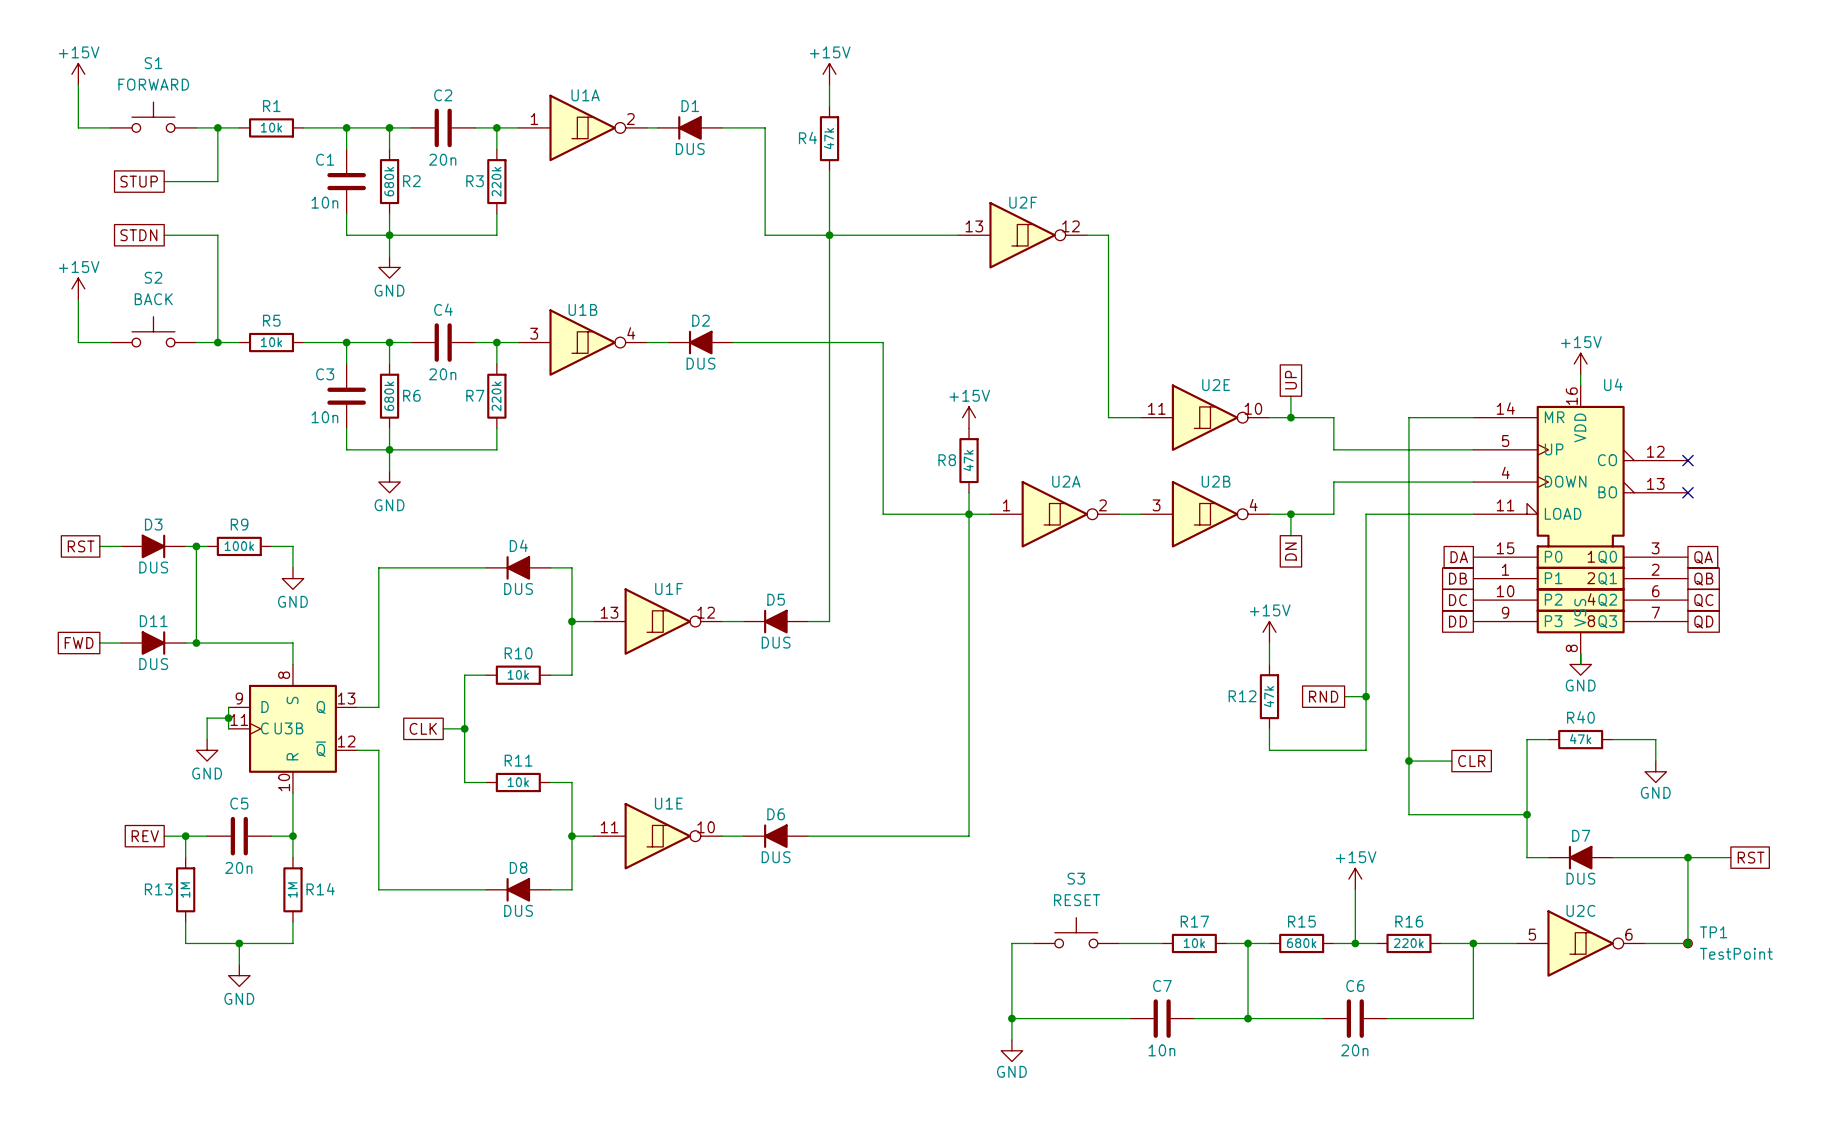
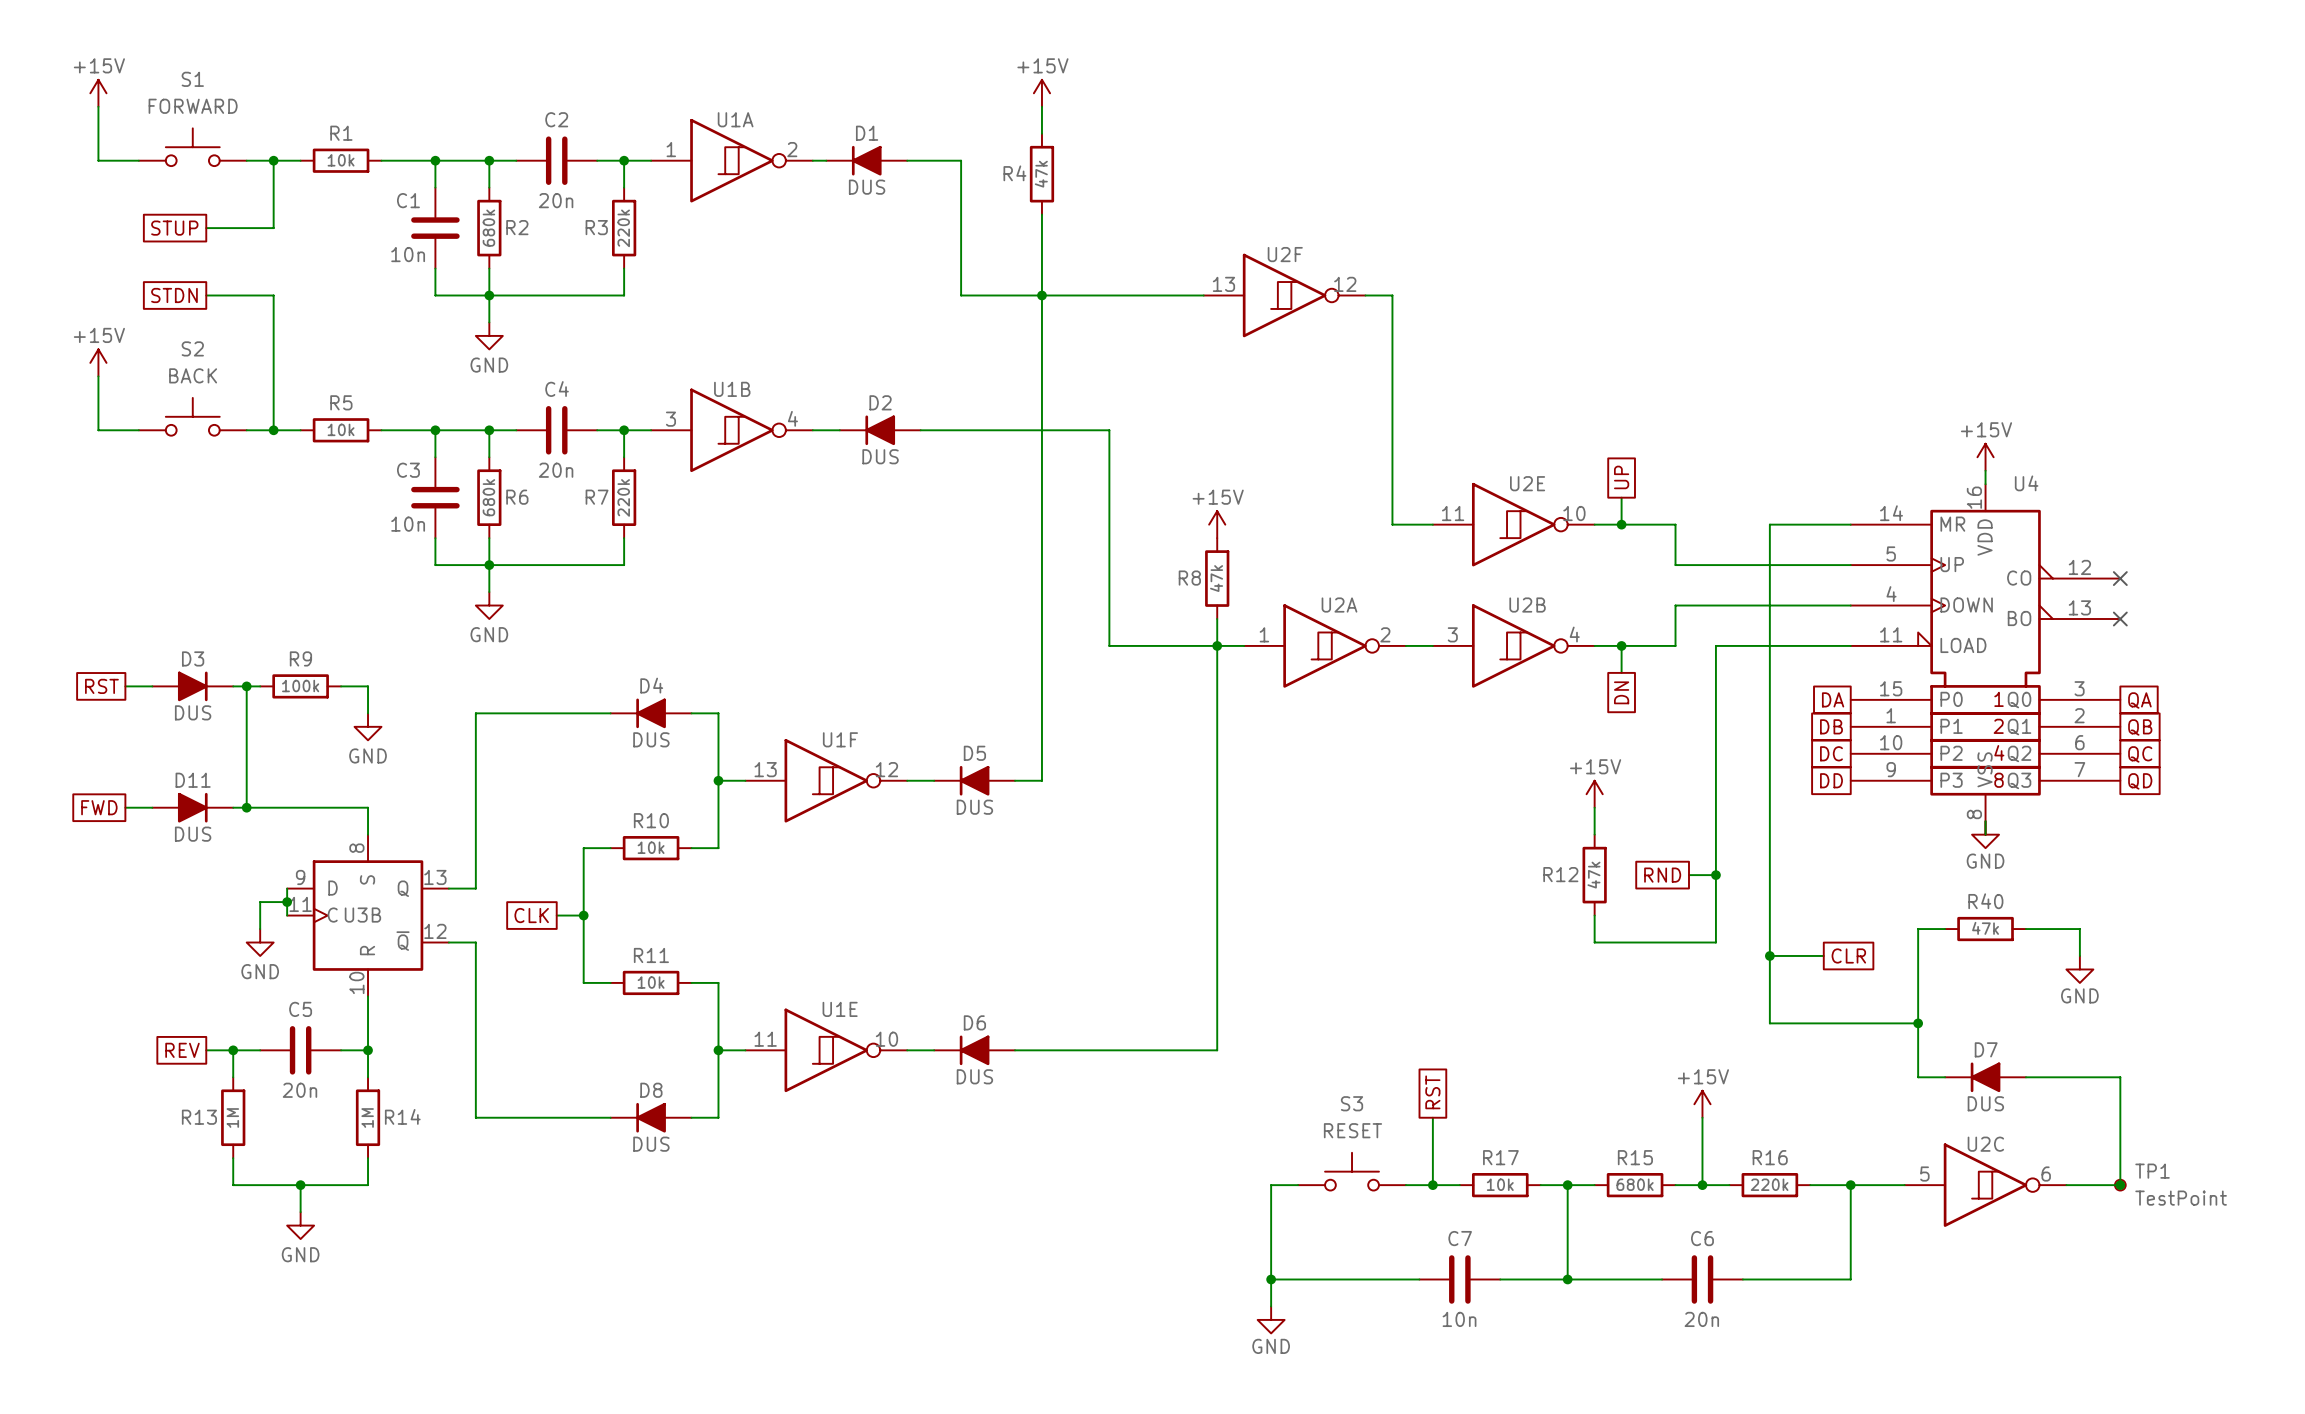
wire: (1687, 857) (1730, 857) -> none
junction: (1687, 857) -> none
global label: RST (1751, 857) -> none
global label: none -> RST (1432, 1092)
wire: none -> (1432, 1117) (1432, 1185)
junction: none -> (1432, 1185)

